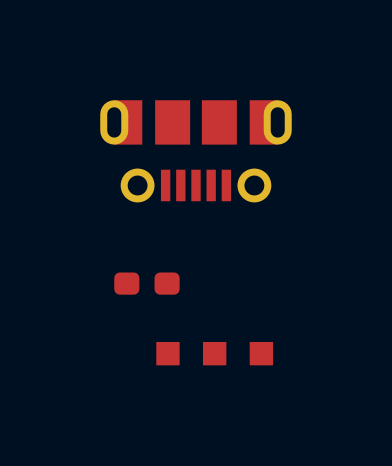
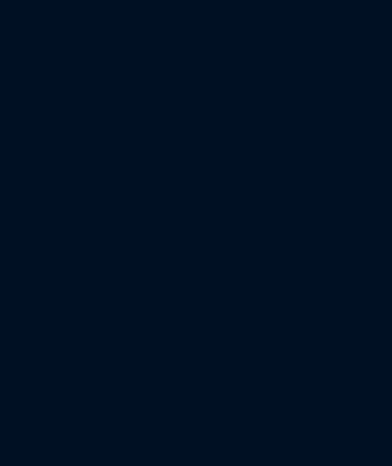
part: (195, 151) -> none
part: (146, 283) -> none
part: (167, 353) -> none
part: (214, 353) -> none
part: (261, 353) -> none

